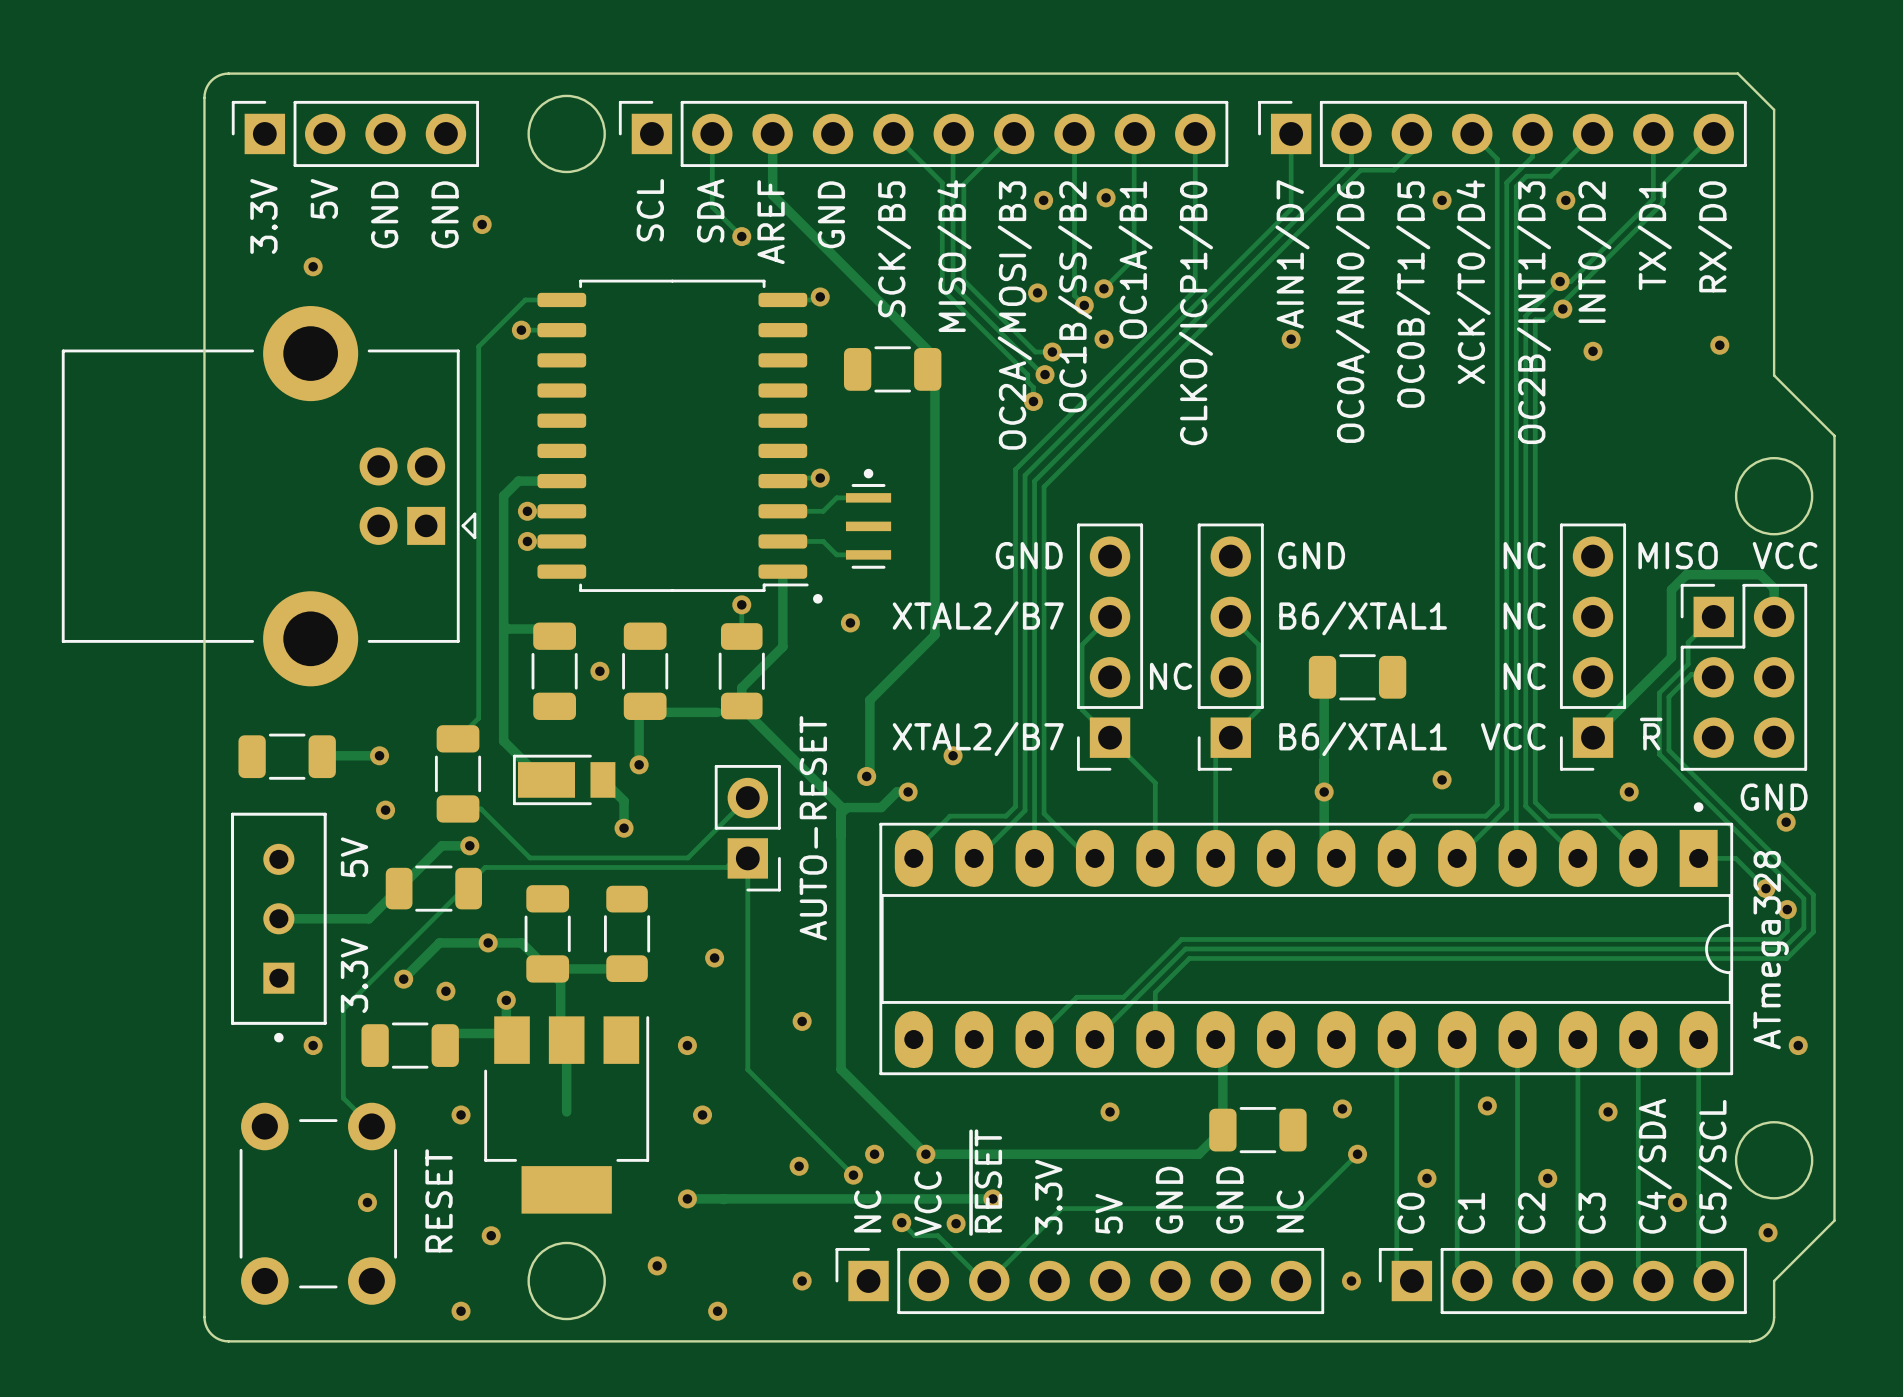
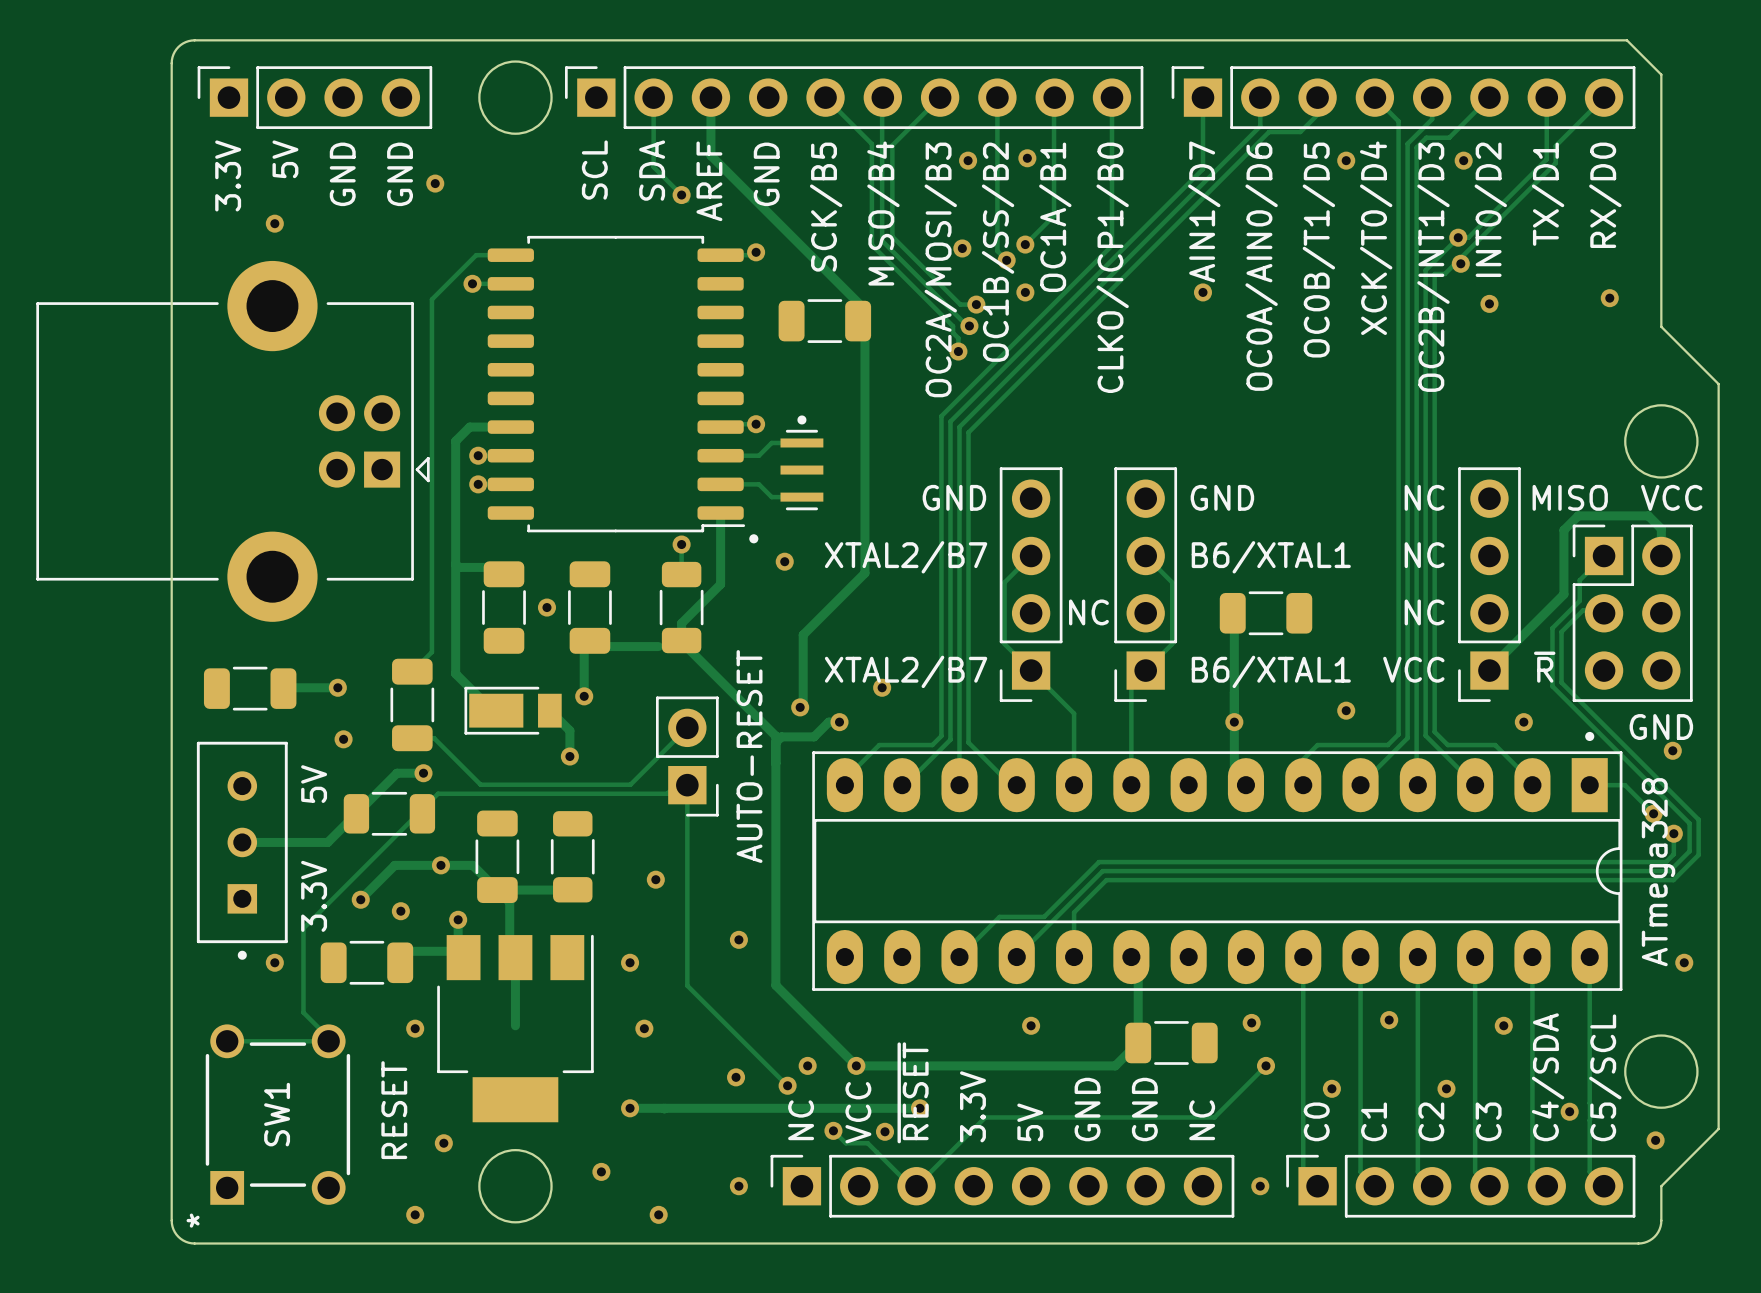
track: none -> (227, 1041) (328, 1041)
via: (367, 1202) -> none
part: (318, 1203) -> none
SW1: none -> (277, 1114)

